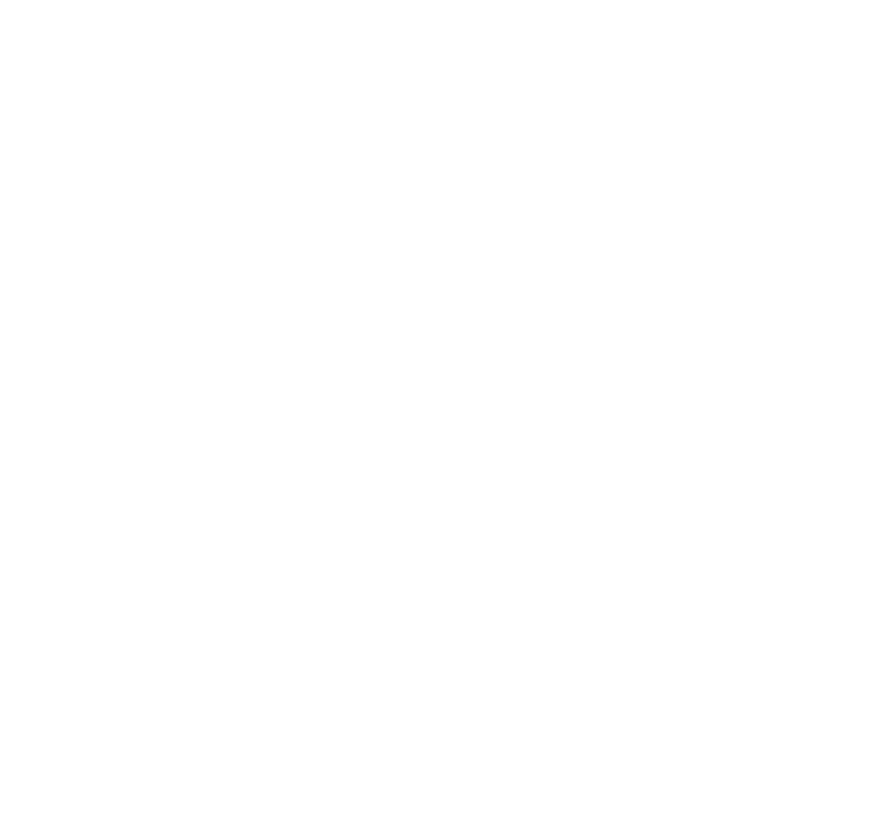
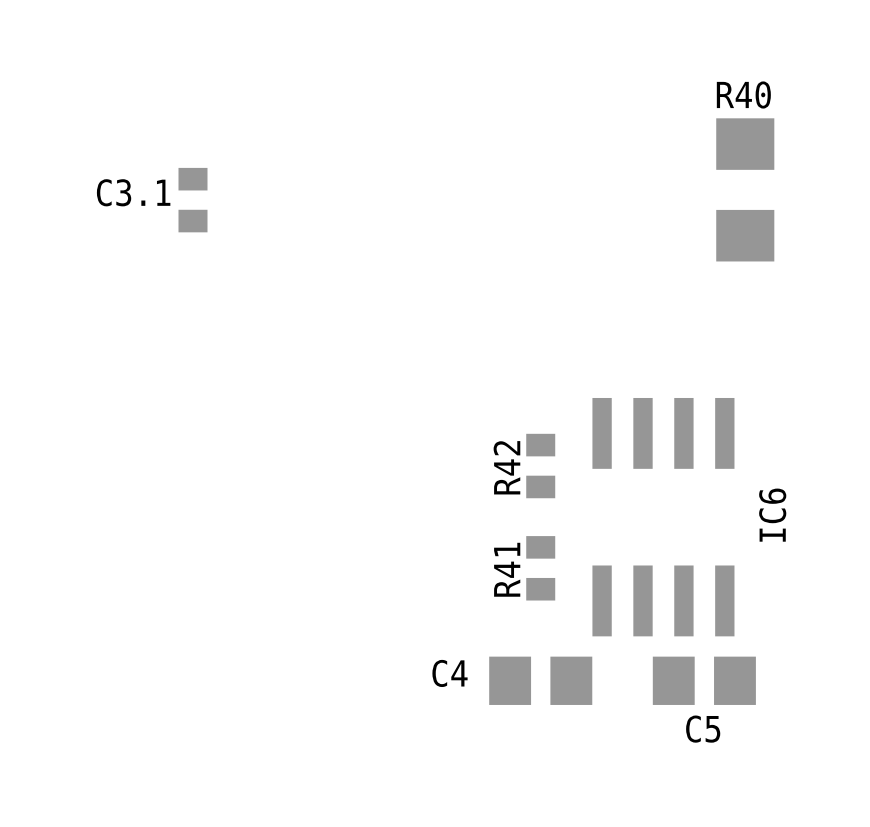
R40: none -> (745, 189)
C3.1: none -> (193, 200)
R42: none -> (540, 466)
IC6: none -> (663, 517)
R41: none -> (540, 568)
C4: none -> (540, 680)
C5: none -> (704, 680)

